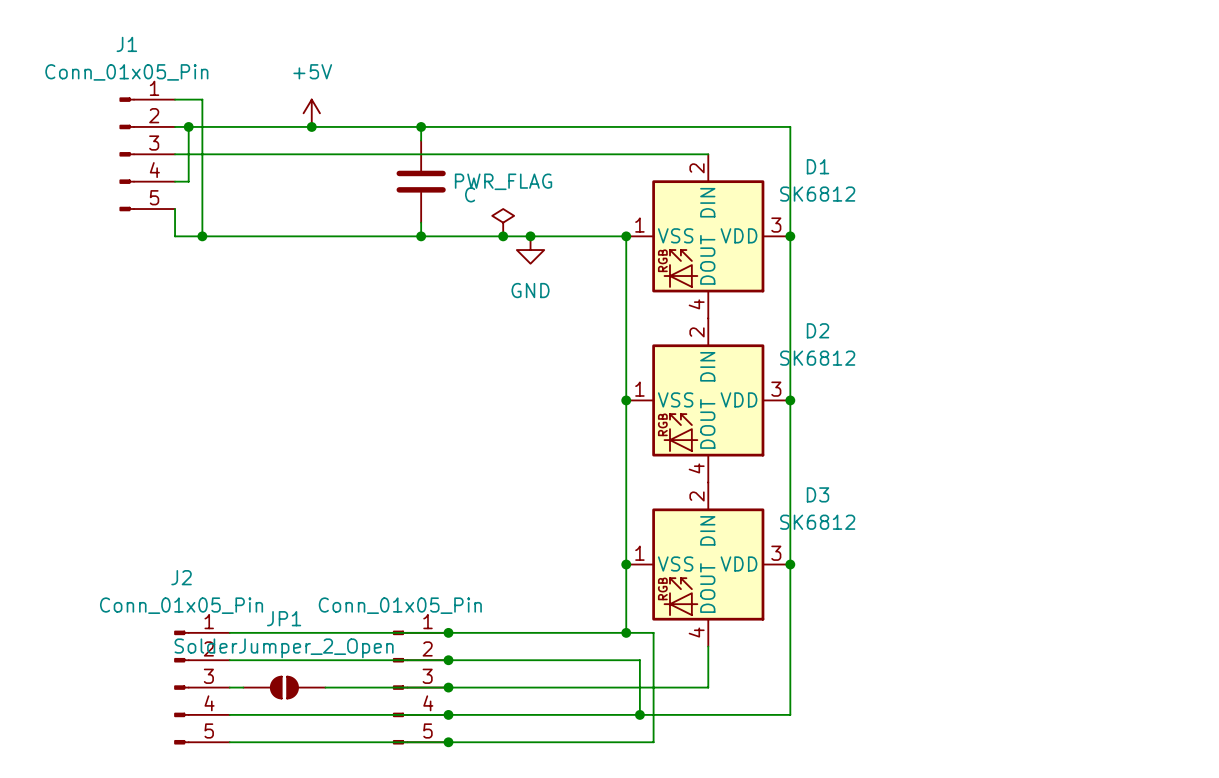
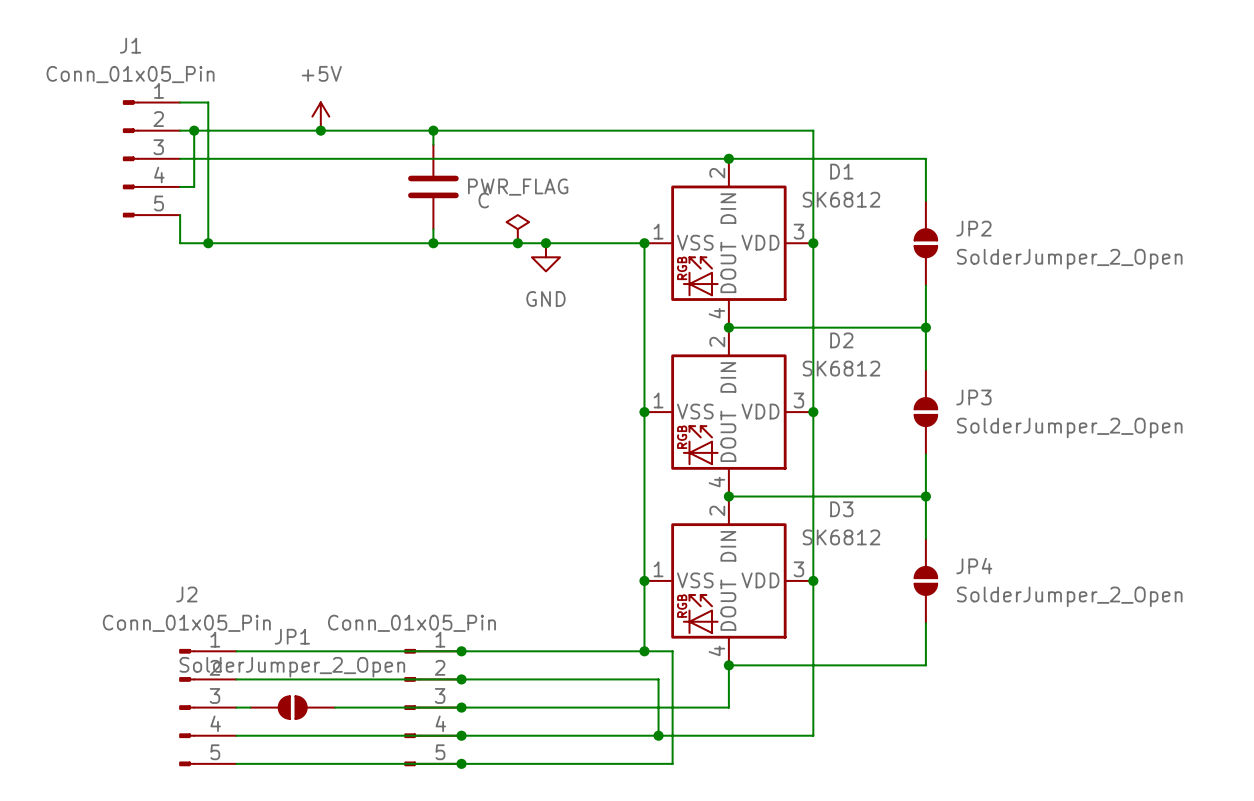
wire: none -> (728, 158) (925, 158) (925, 201)
junction: none -> (728, 158)
JP2: none -> SolderJumper_2_Open (925, 243)
wire: none -> (925, 285) (925, 369)
wire: none -> (728, 327) (925, 327)
junction: none -> (728, 327)
junction: none -> (925, 327)
JP3: none -> SolderJumper_2_Open (925, 412)
wire: none -> (925, 454) (925, 538)
wire: none -> (728, 496) (925, 496)
junction: none -> (728, 496)
junction: none -> (925, 496)
JP4: none -> SolderJumper_2_Open (925, 580)
wire: none -> (925, 623) (925, 665) (728, 665)
junction: none -> (728, 665)

